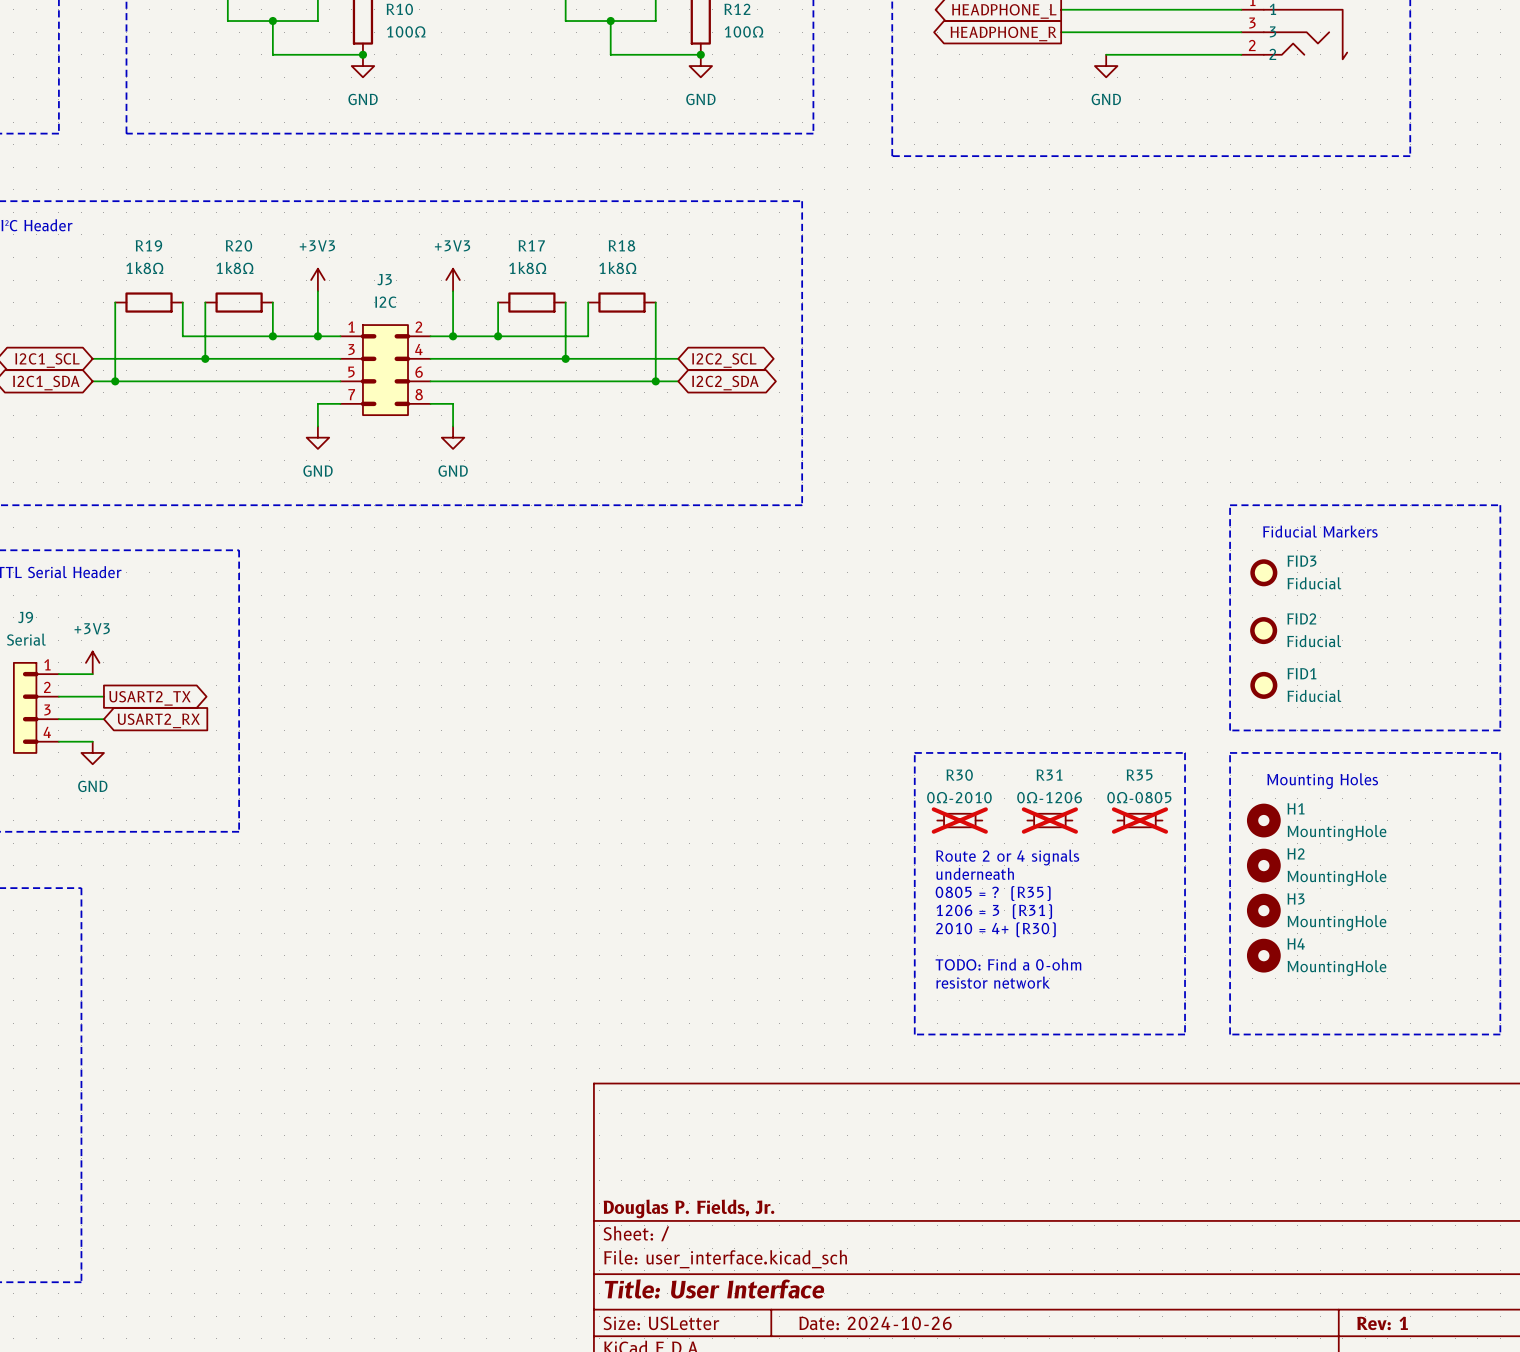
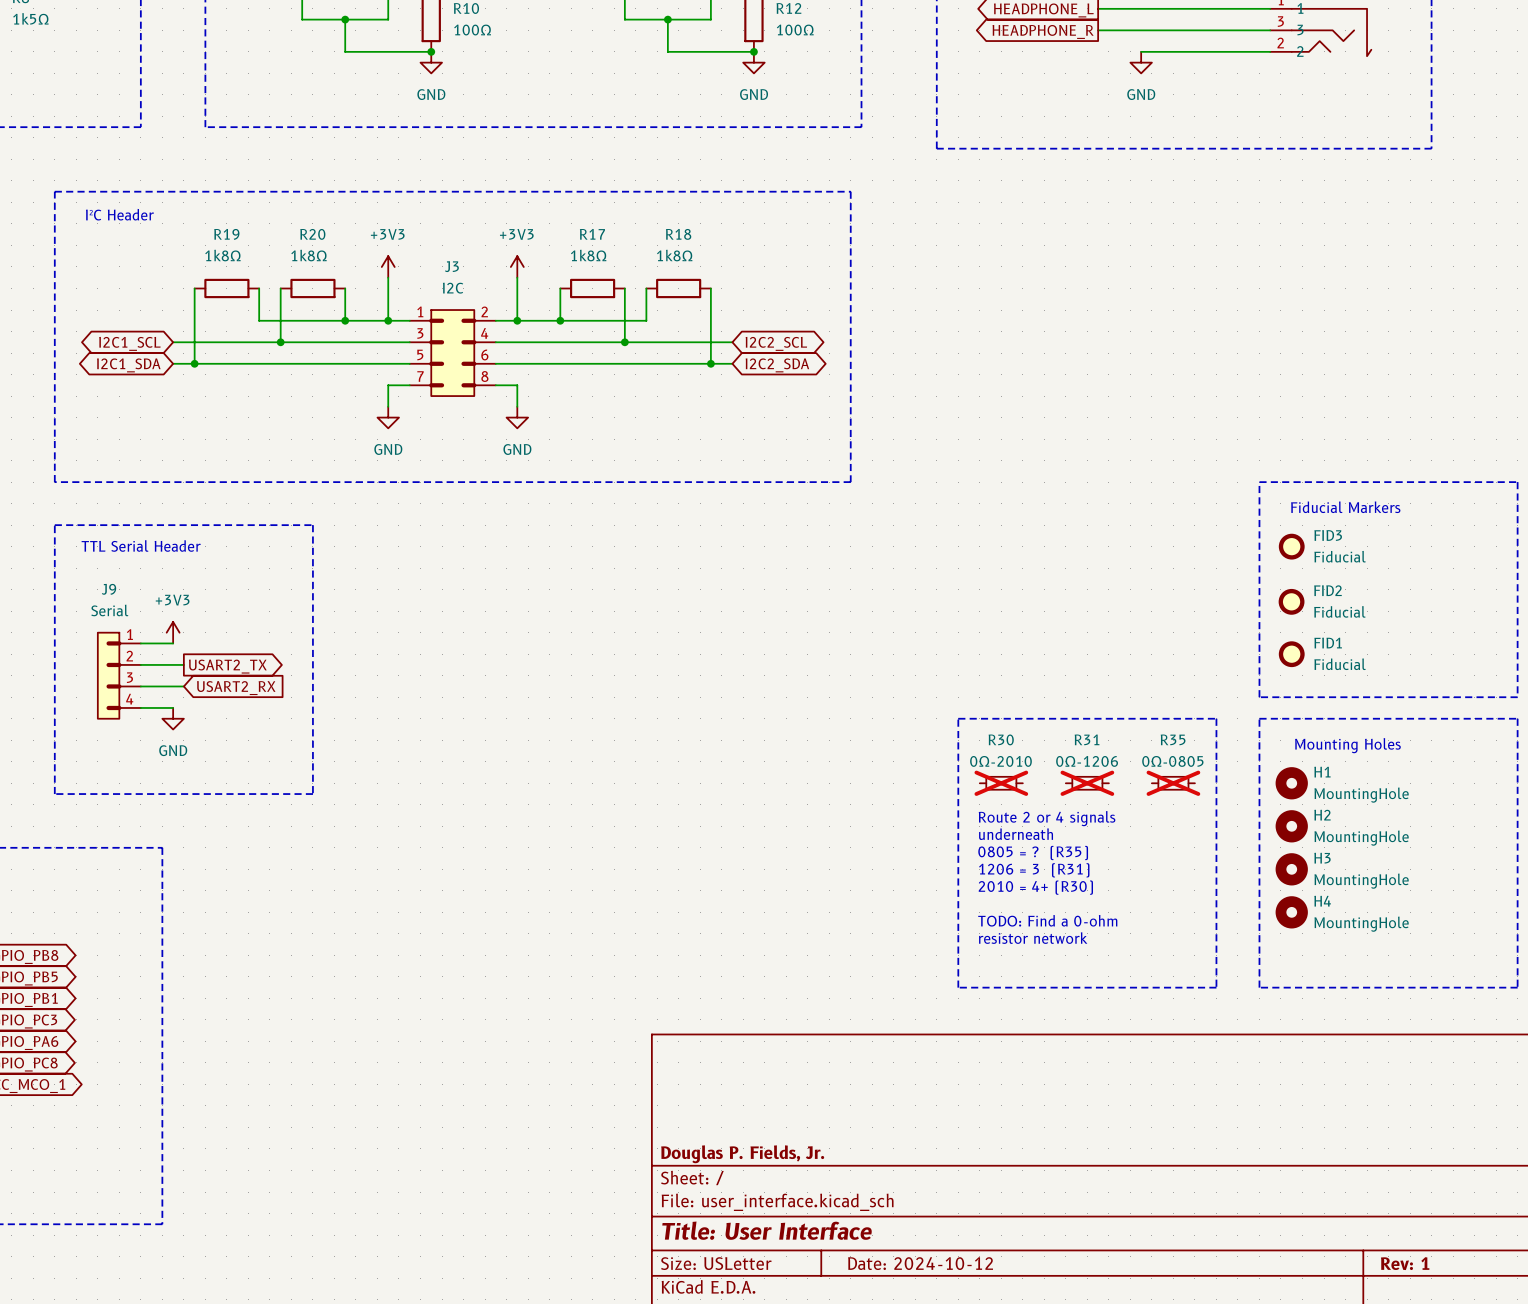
title block: Date: 2024-10-26 (875, 1323) -> Date: 2024-10-12 (920, 1263)

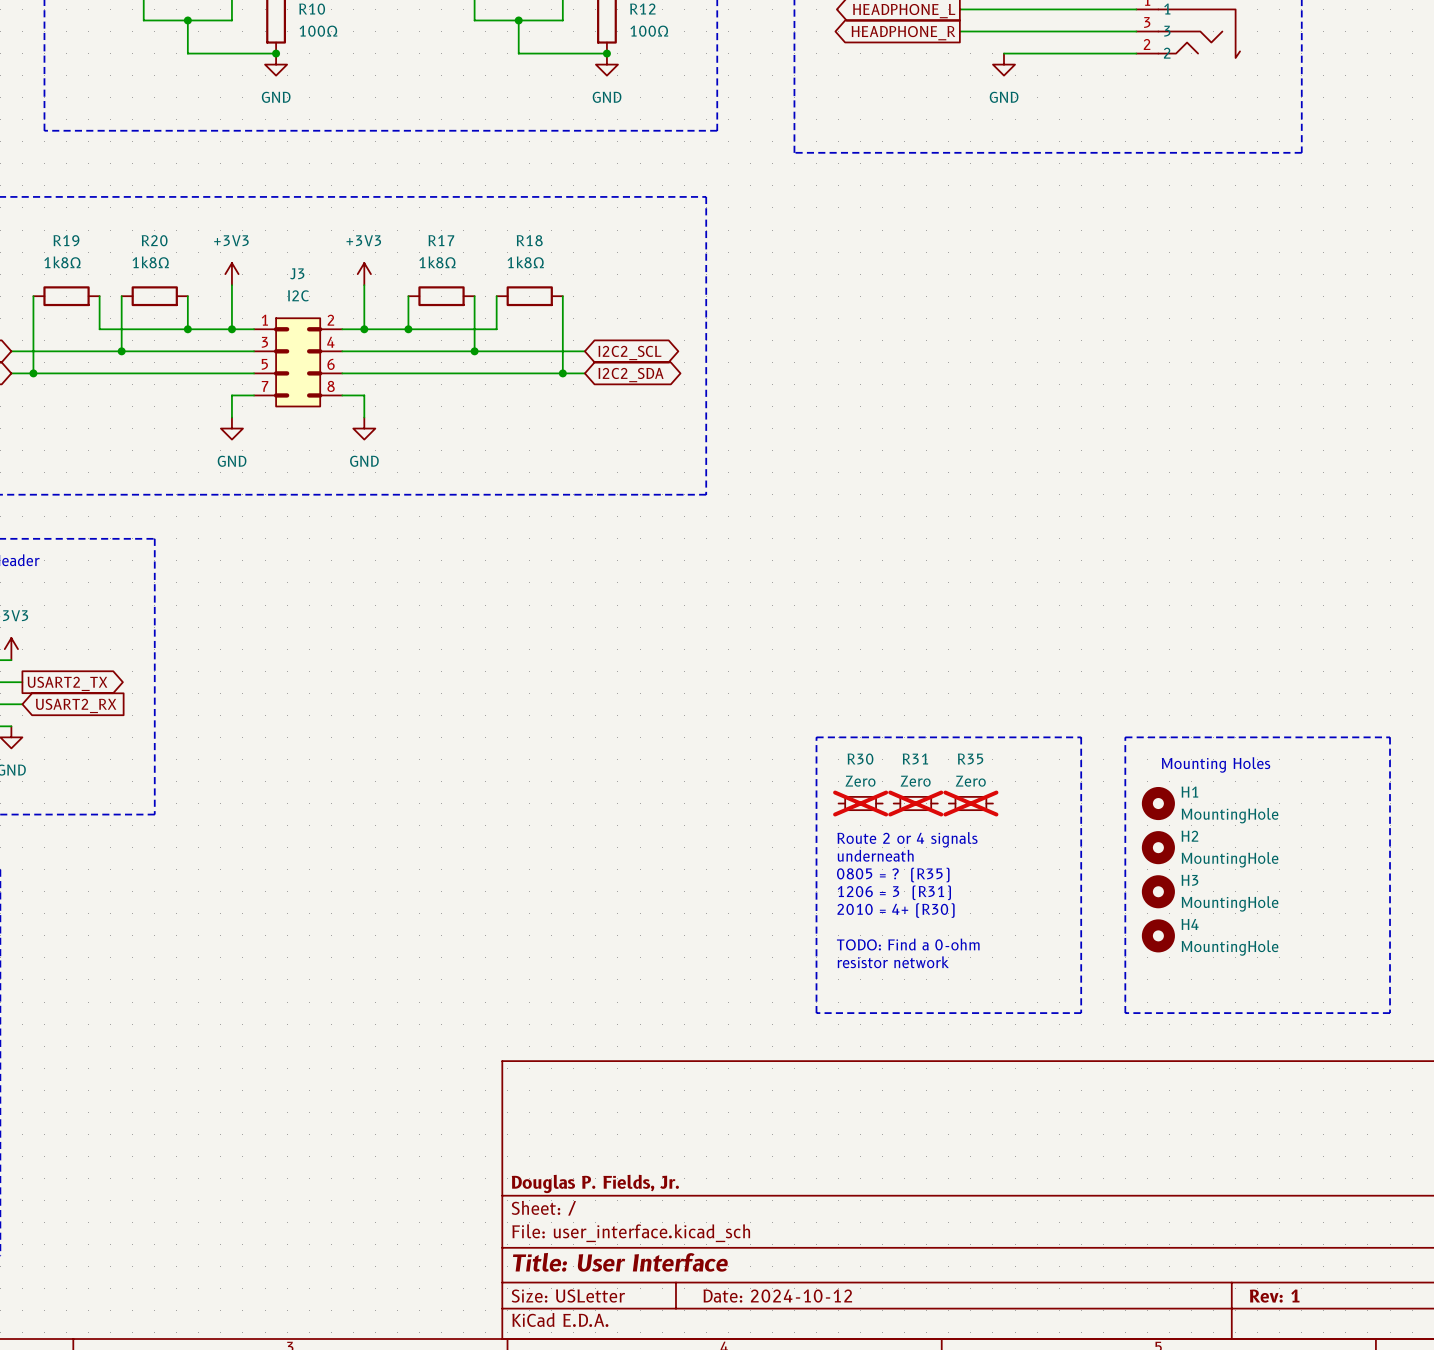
line: (1259, 482) (1517, 482) (1517, 697) (1259, 697) (1259, 482) -> none
text: Fiducial Markers (1345, 507) -> none
FID3: Fiducial (1291, 546) -> none
FID2: Fiducial (1291, 601) -> none
FID1: Fiducial (1291, 654) -> none
R30 value: 0Ω-2010 (1000, 761) -> Zero (860, 781)
R31 value: 0Ω-1206 (1087, 761) -> Zero (915, 781)
R35 value: 0Ω-0805 (1172, 761) -> Zero (970, 781)
R31 position: (1087, 783) -> (915, 803)
R35 position: (1173, 783) -> (970, 803)

